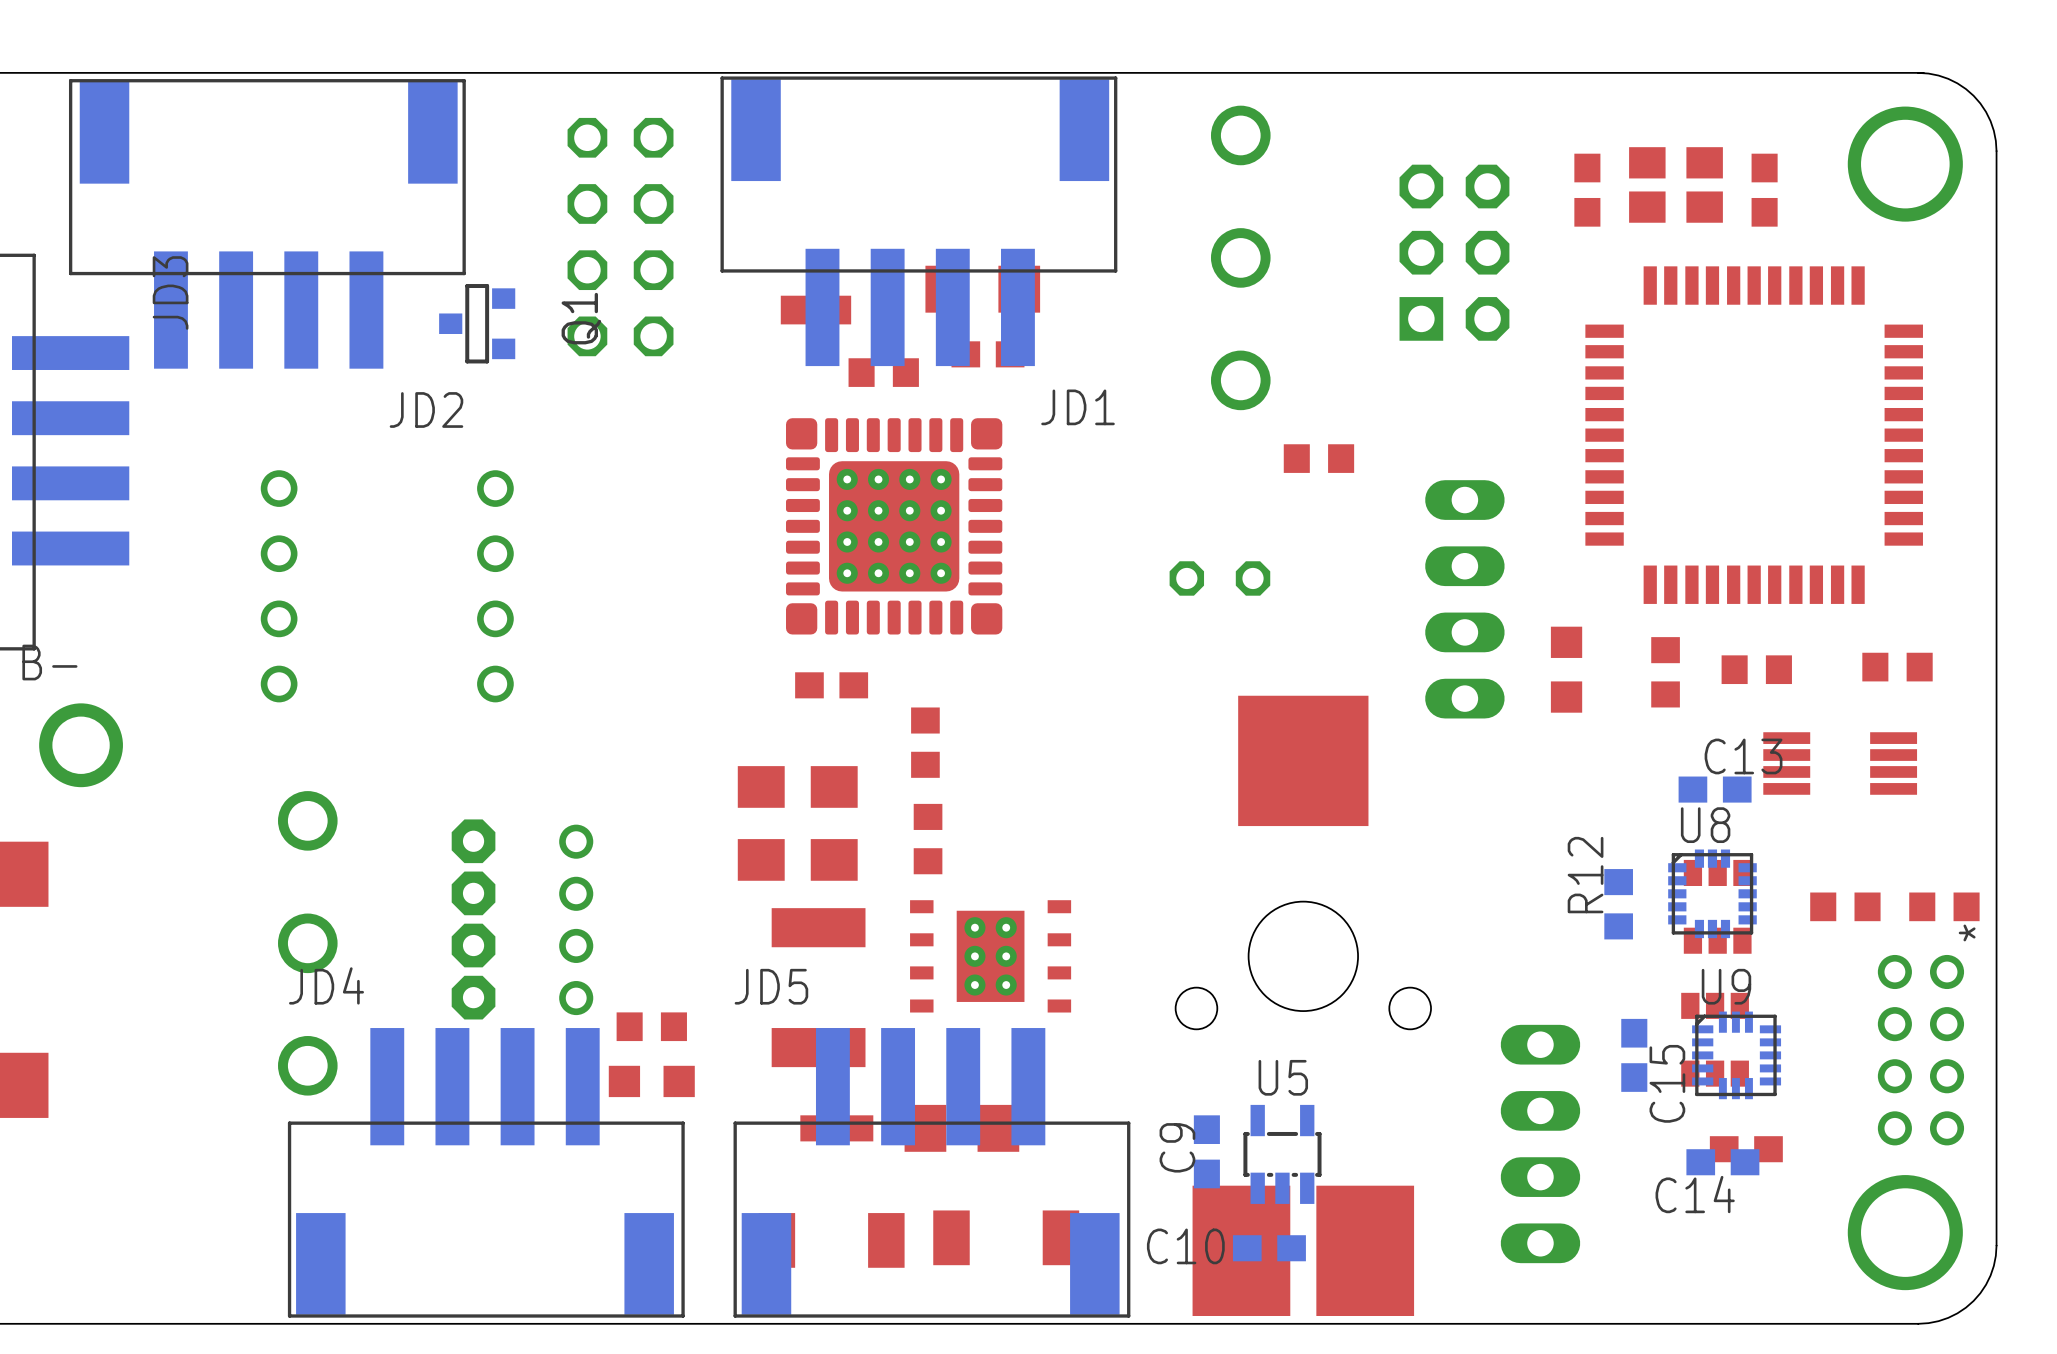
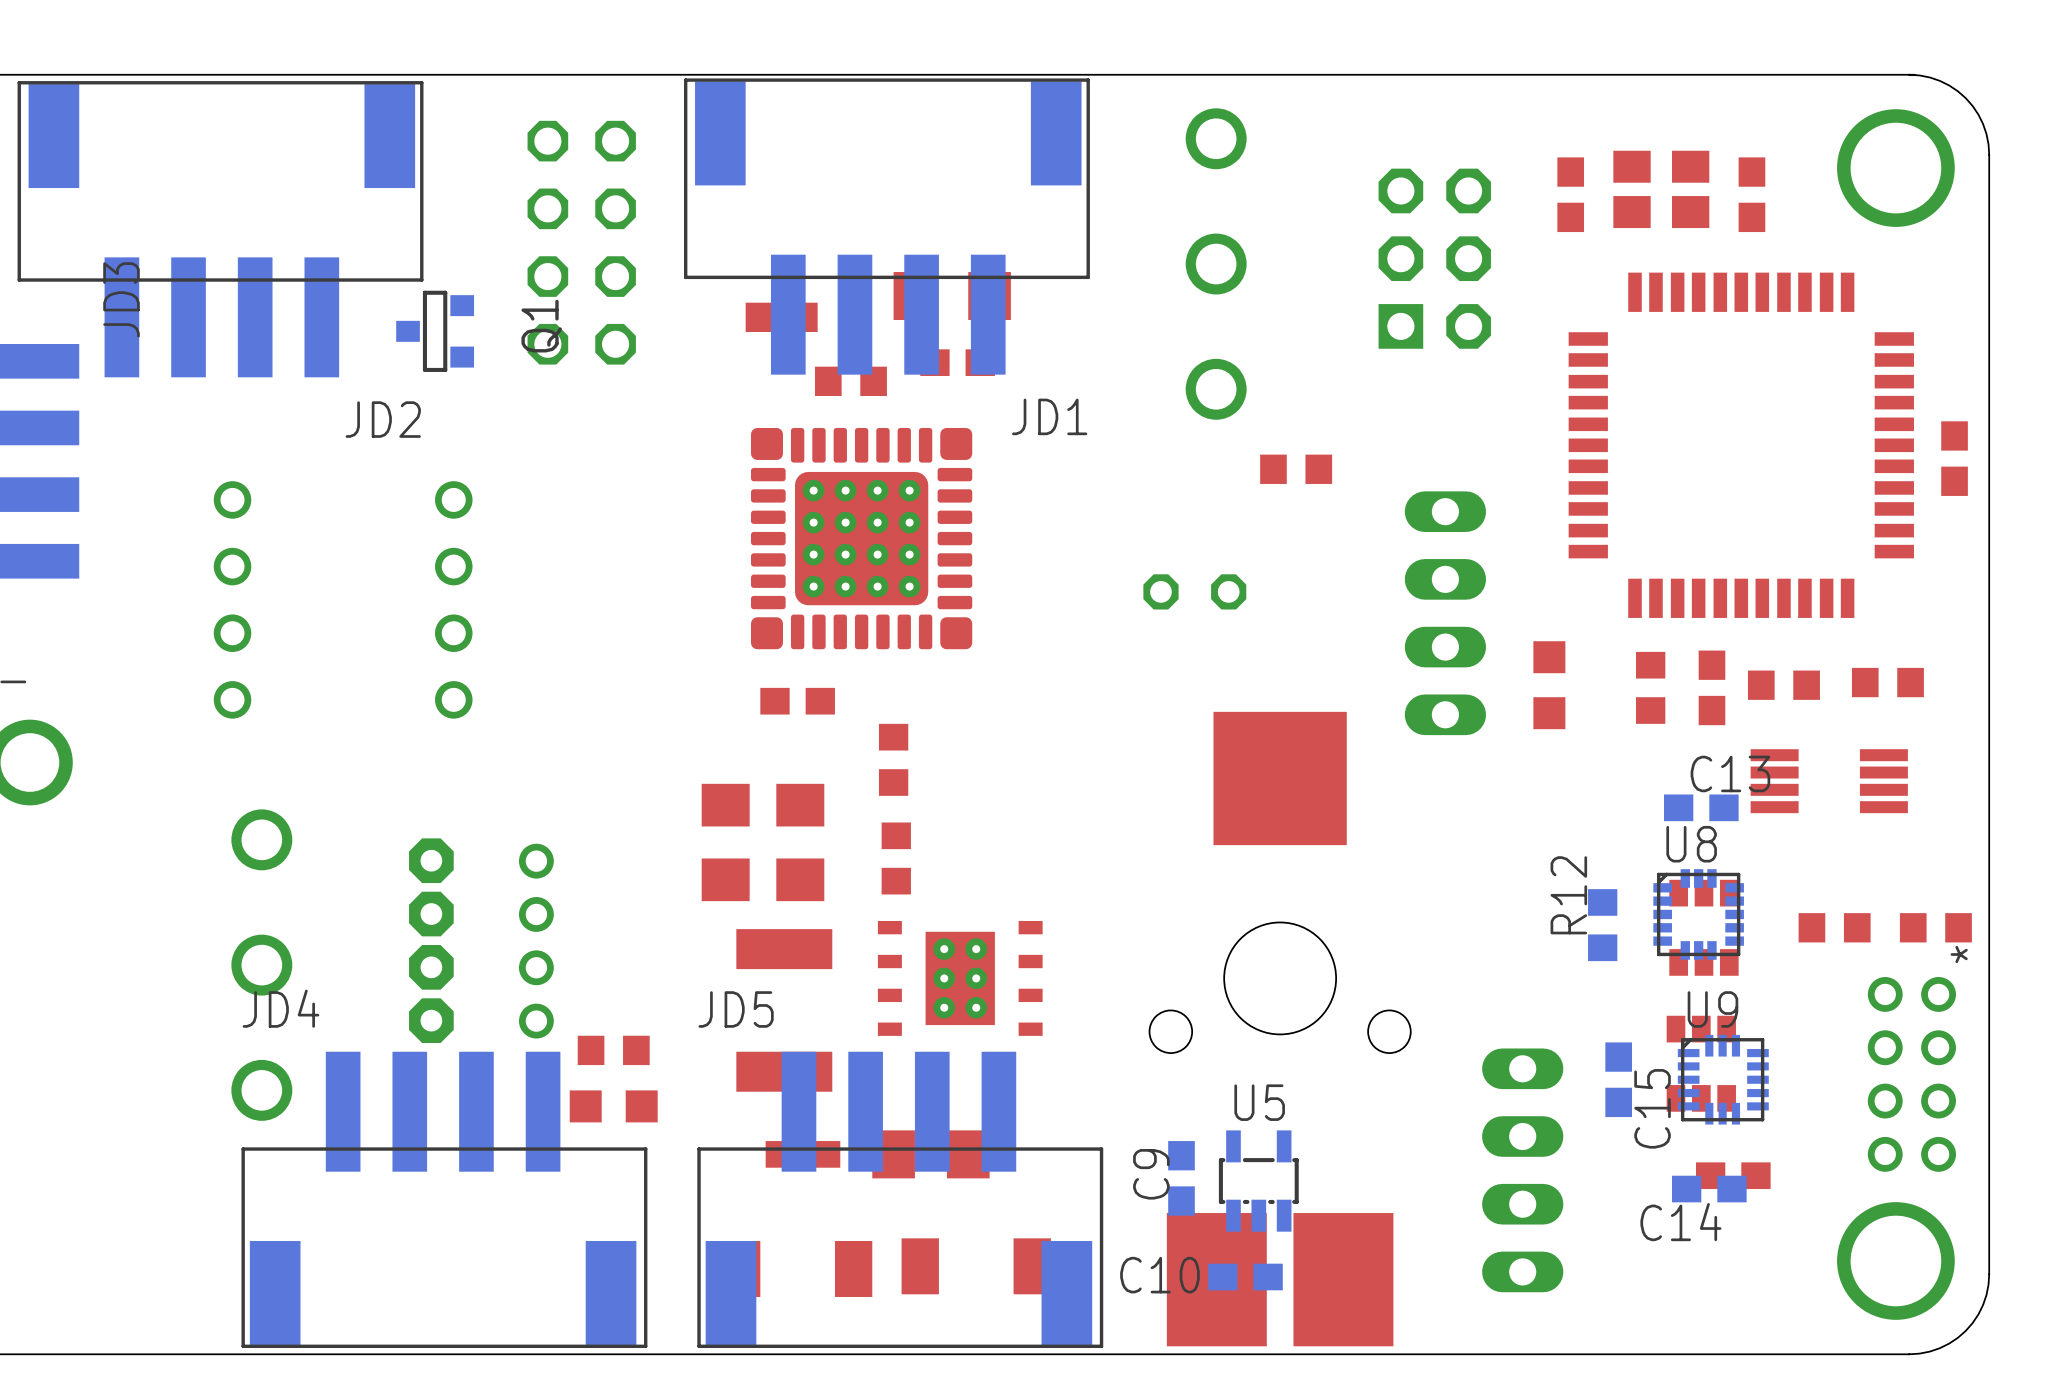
part: none -> (1954, 458)
part position: (1756, 669) -> (1783, 685)
part: none -> (1711, 687)

